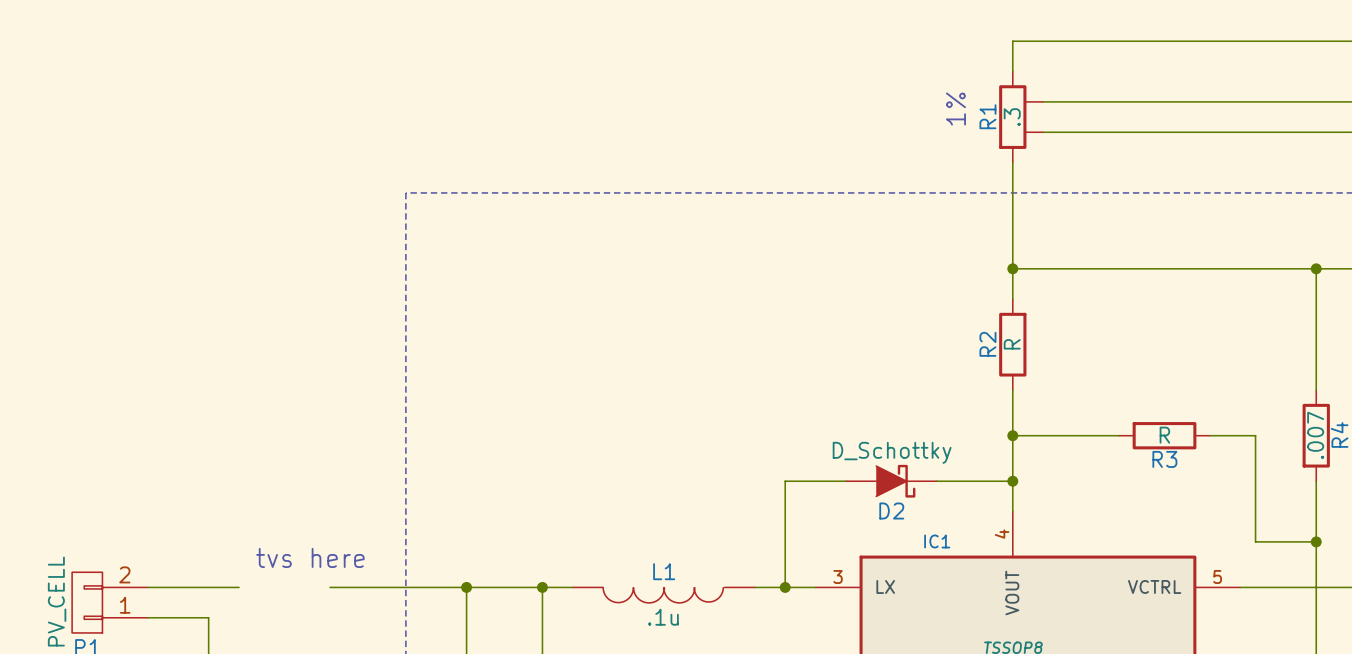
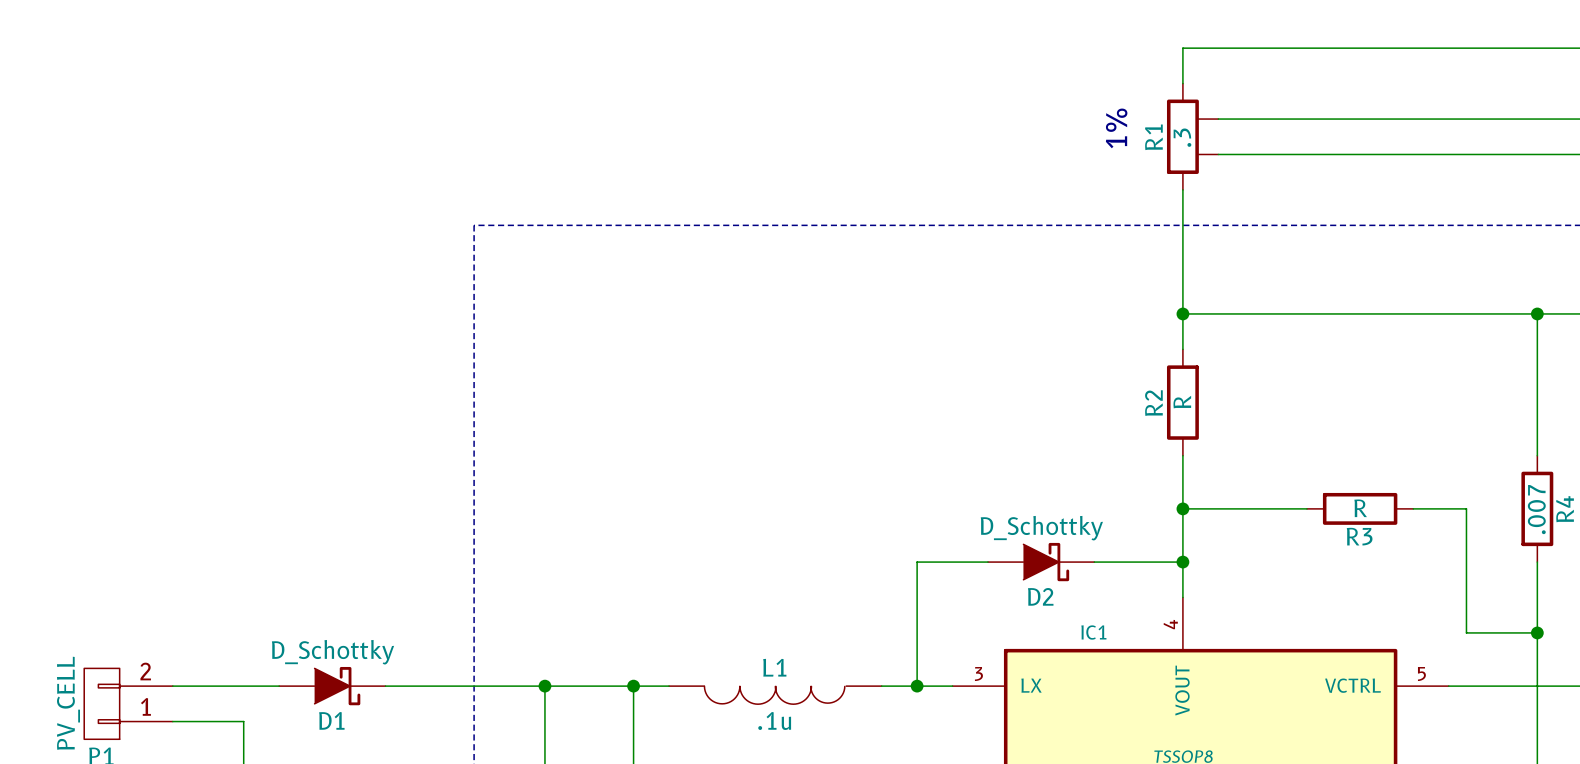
text: tvs here (310, 557) -> none
D1: none -> D_Schottky (332, 686)

